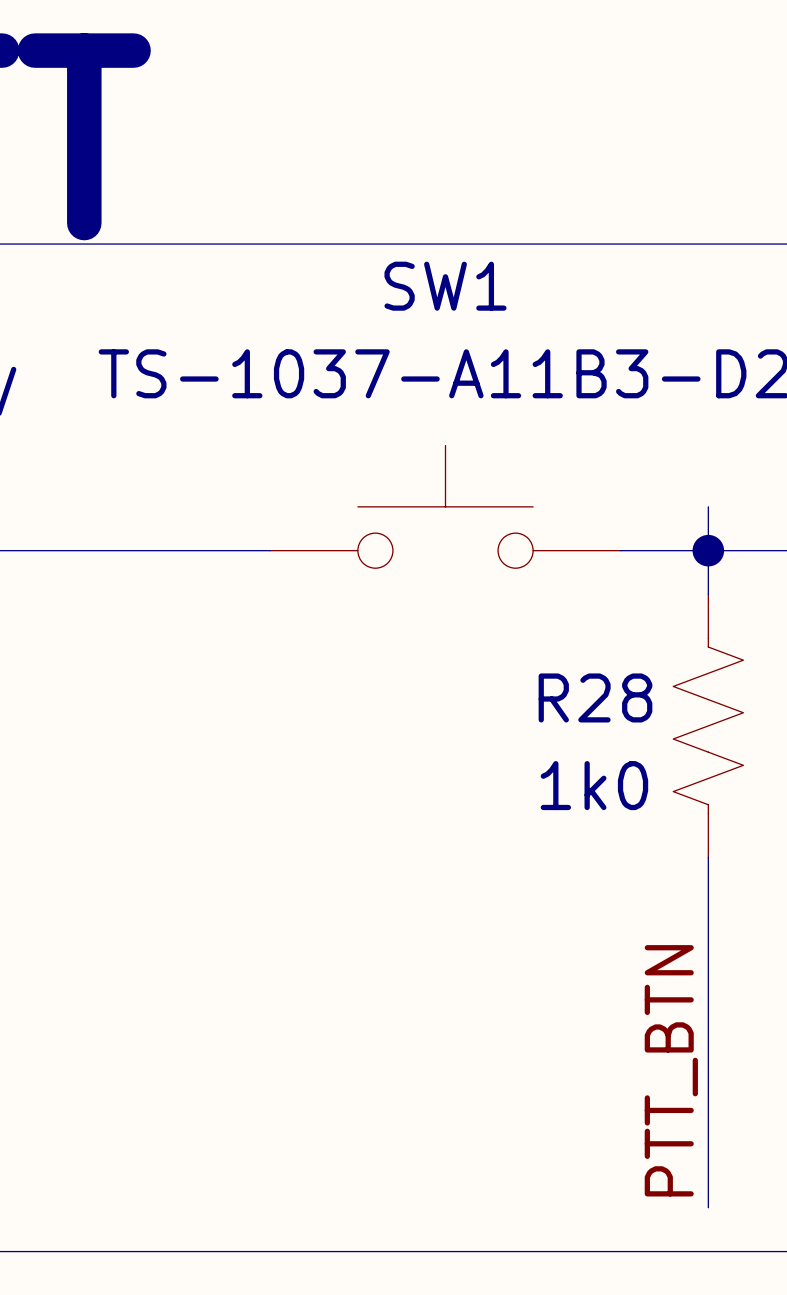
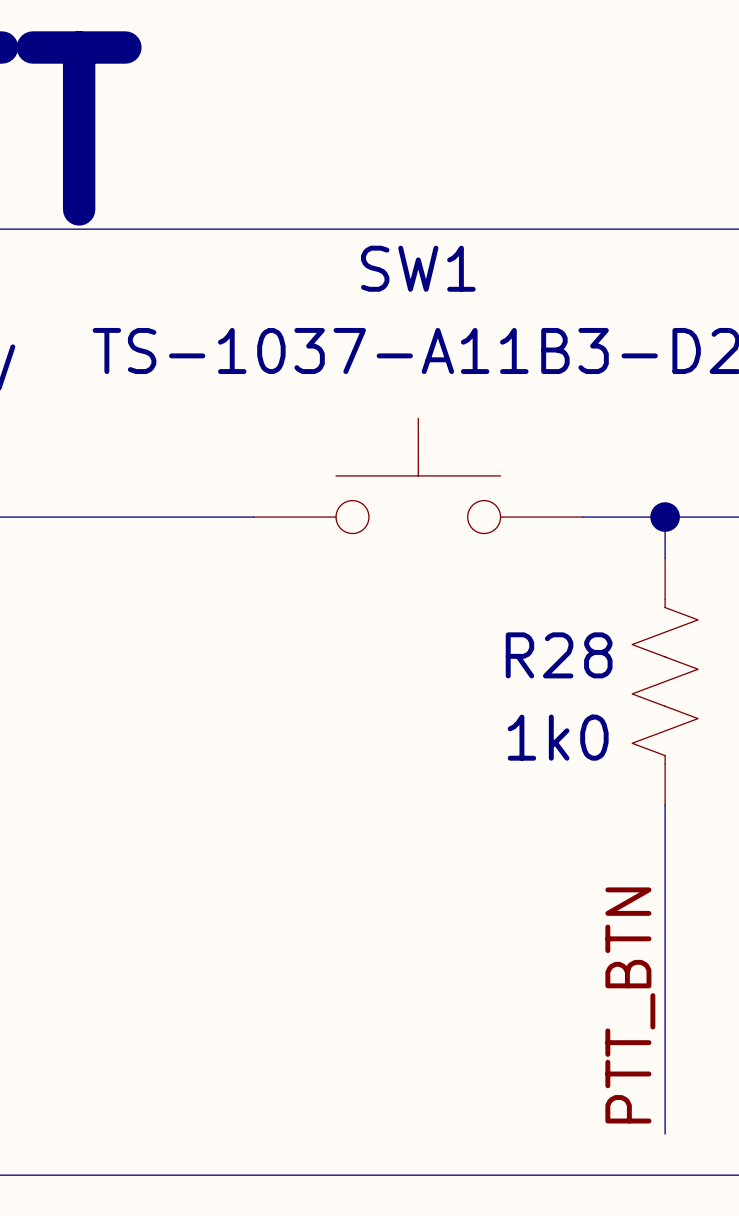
wire: (708, 506) (708, 550) -> none

